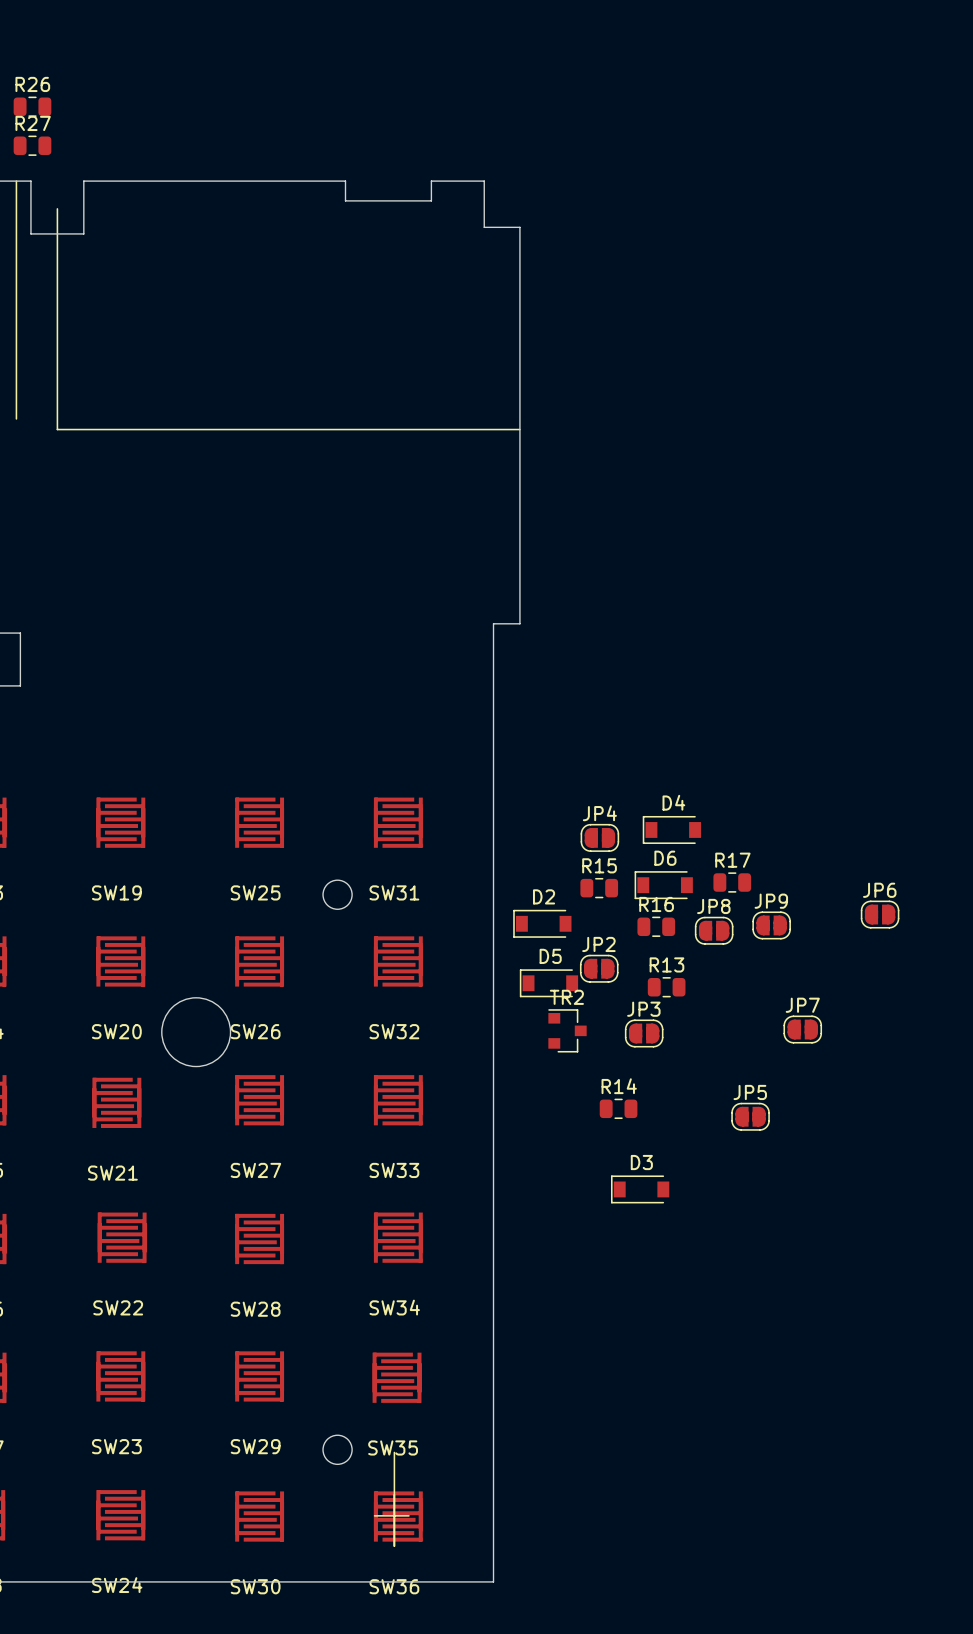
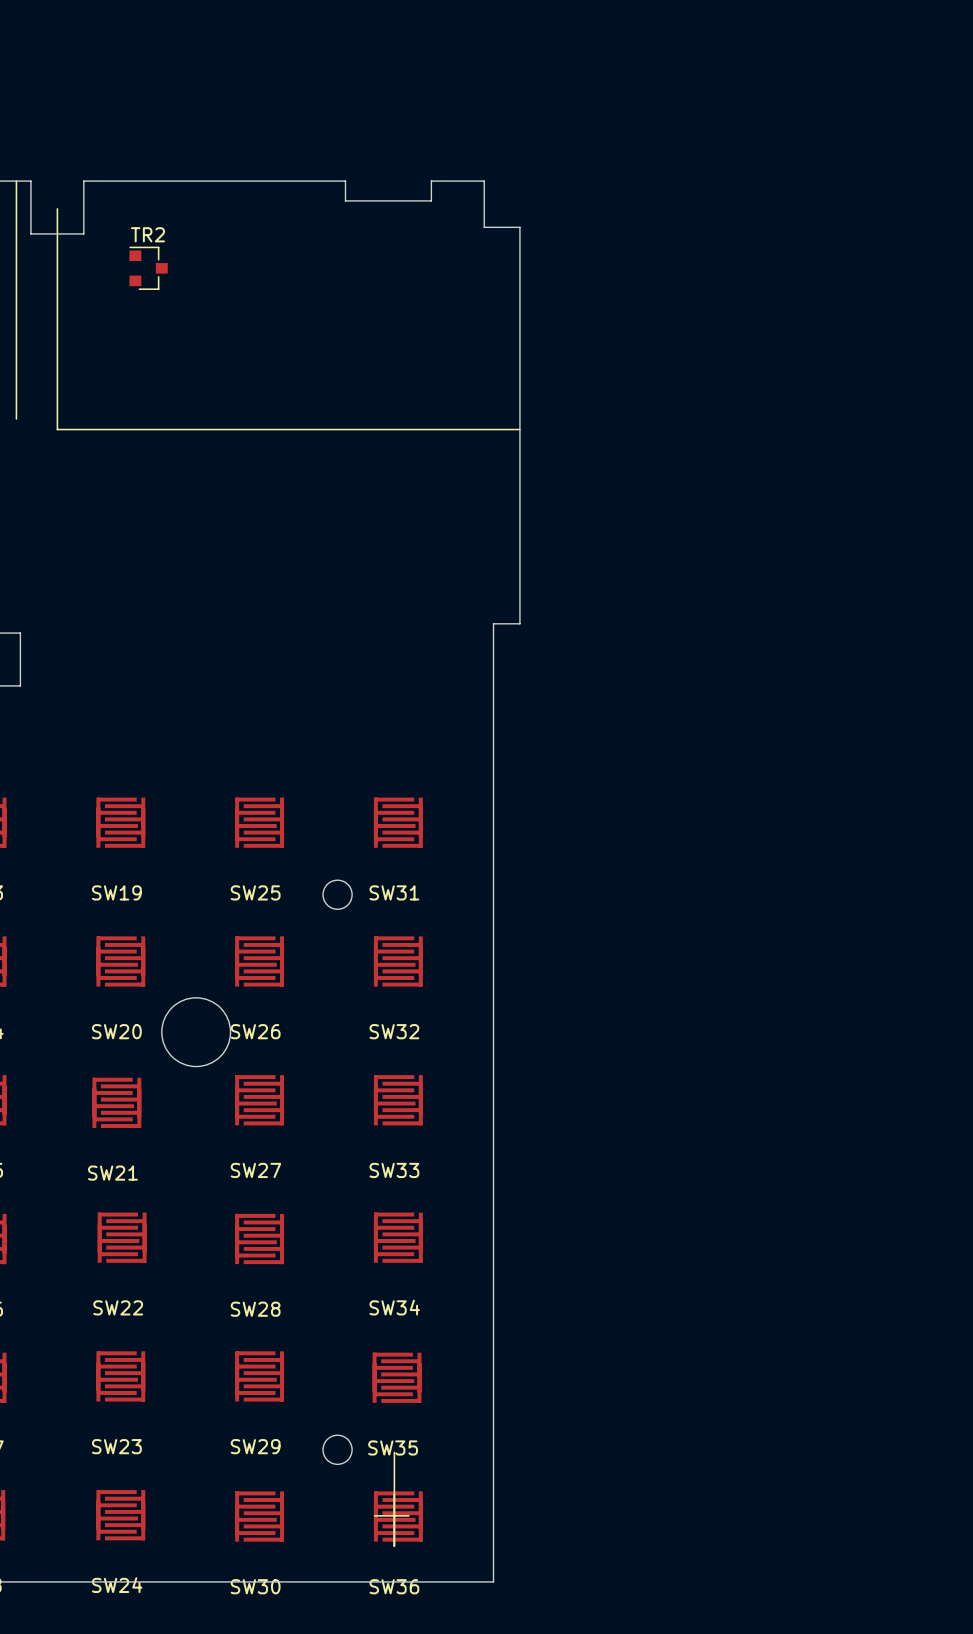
R26: (32, 106) -> none
R27: (32, 145) -> none
D4: (671, 829) -> none
JP4: (599, 837) -> none
R17: (732, 882) -> none
D6: (663, 885) -> none
R15: (599, 888) -> none
JP6: (880, 914) -> none
D2: (542, 923) -> none
JP9: (771, 925) -> none
R16: (656, 926) -> none
JP8: (714, 930) -> none
JP2: (599, 968) -> none
D5: (548, 983) -> none
R13: (666, 987) -> none
JP7: (802, 1029) -> none
TR2 position: (567, 1030) -> (148, 268)
JP3: (644, 1033) -> none
R14: (618, 1108) -> none
JP5: (750, 1116) -> none
D3: (640, 1189) -> none

